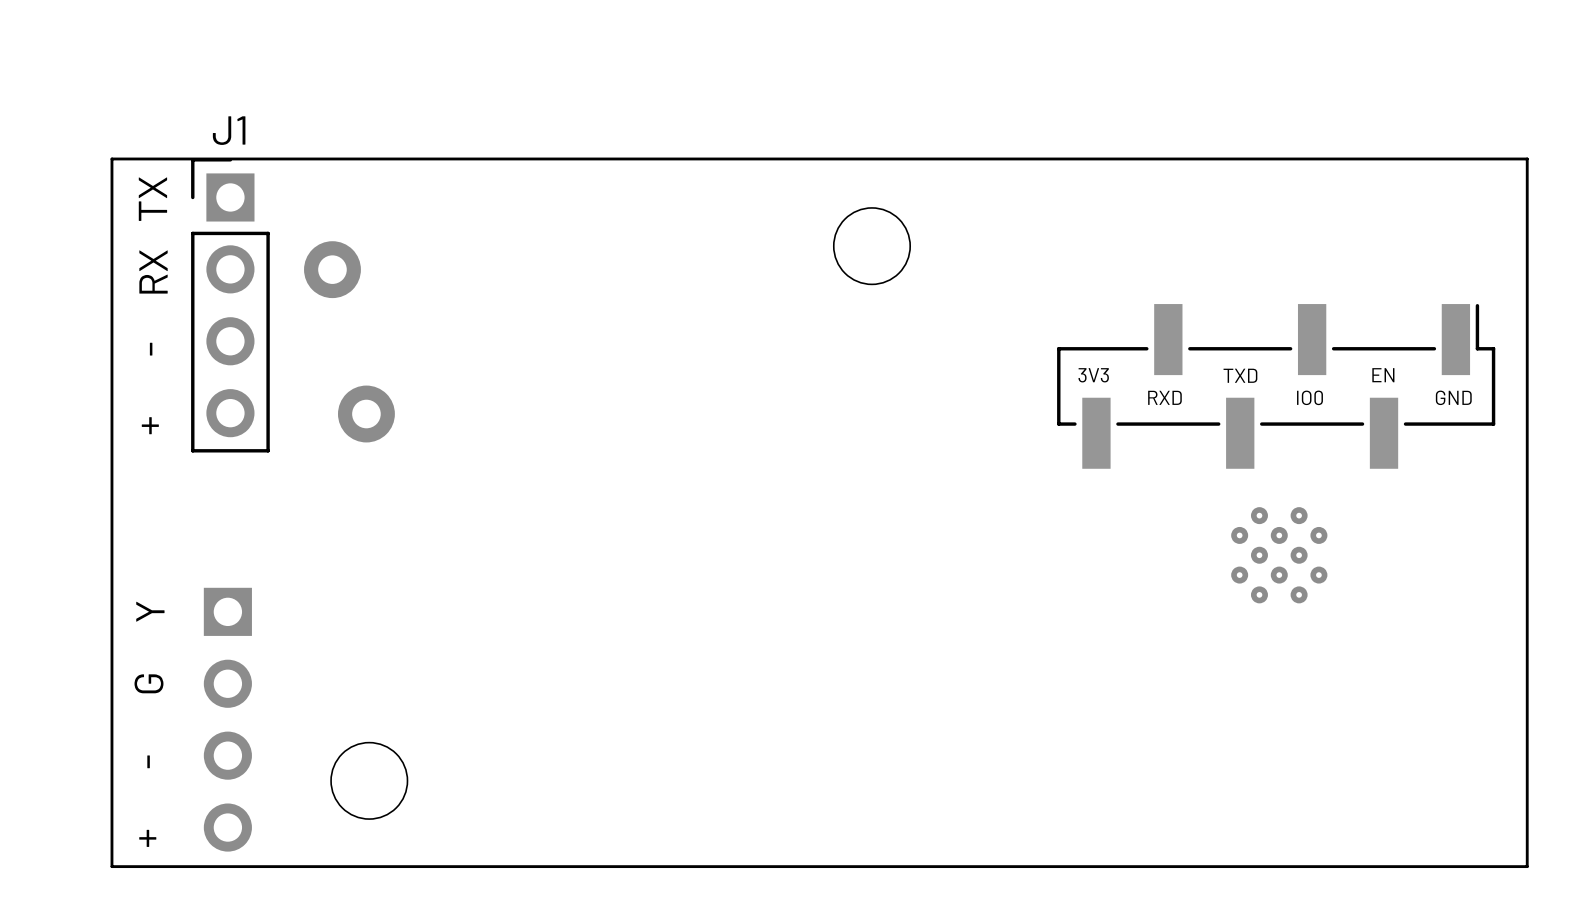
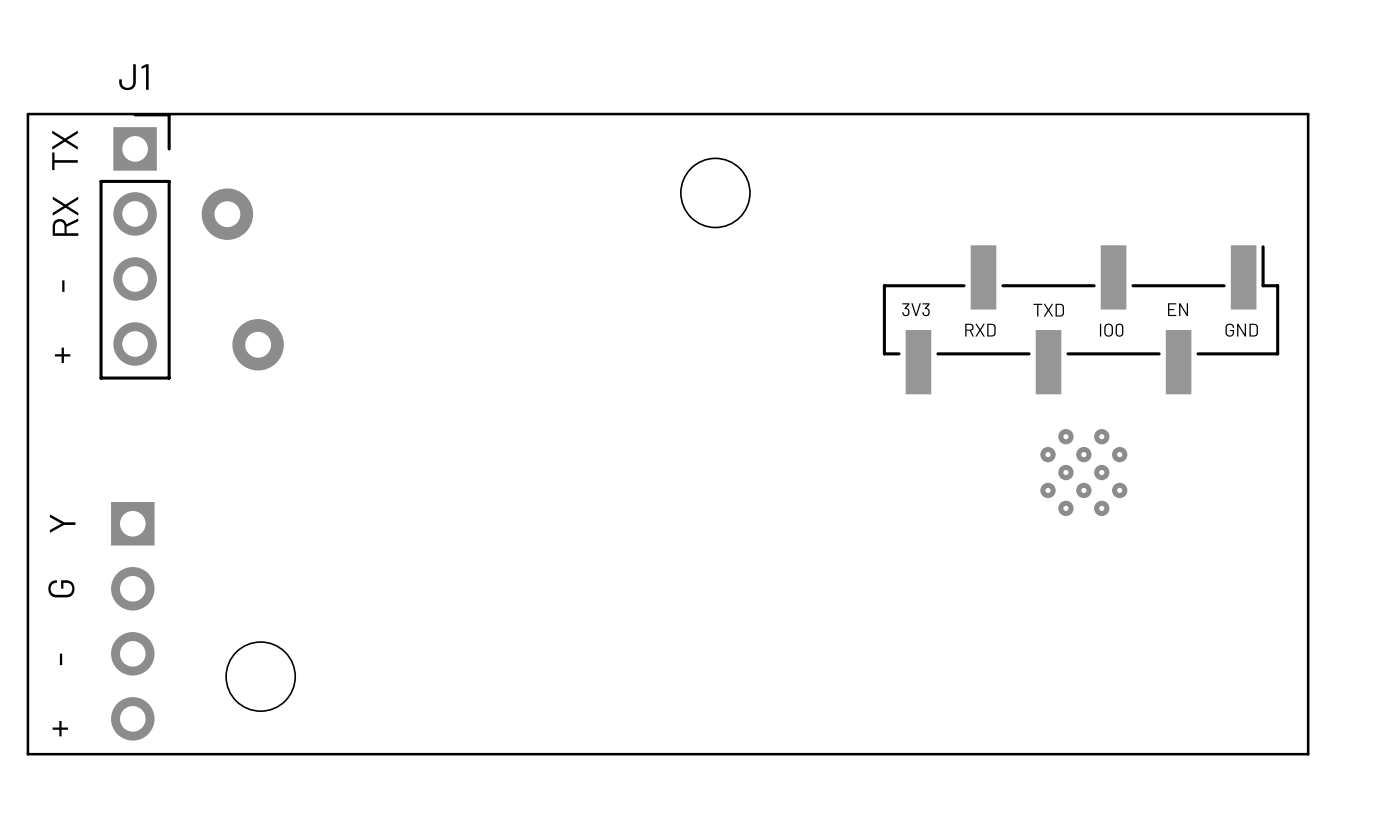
J1 footprint: [191, 158, 270, 453] -> [99, 113, 171, 380]

